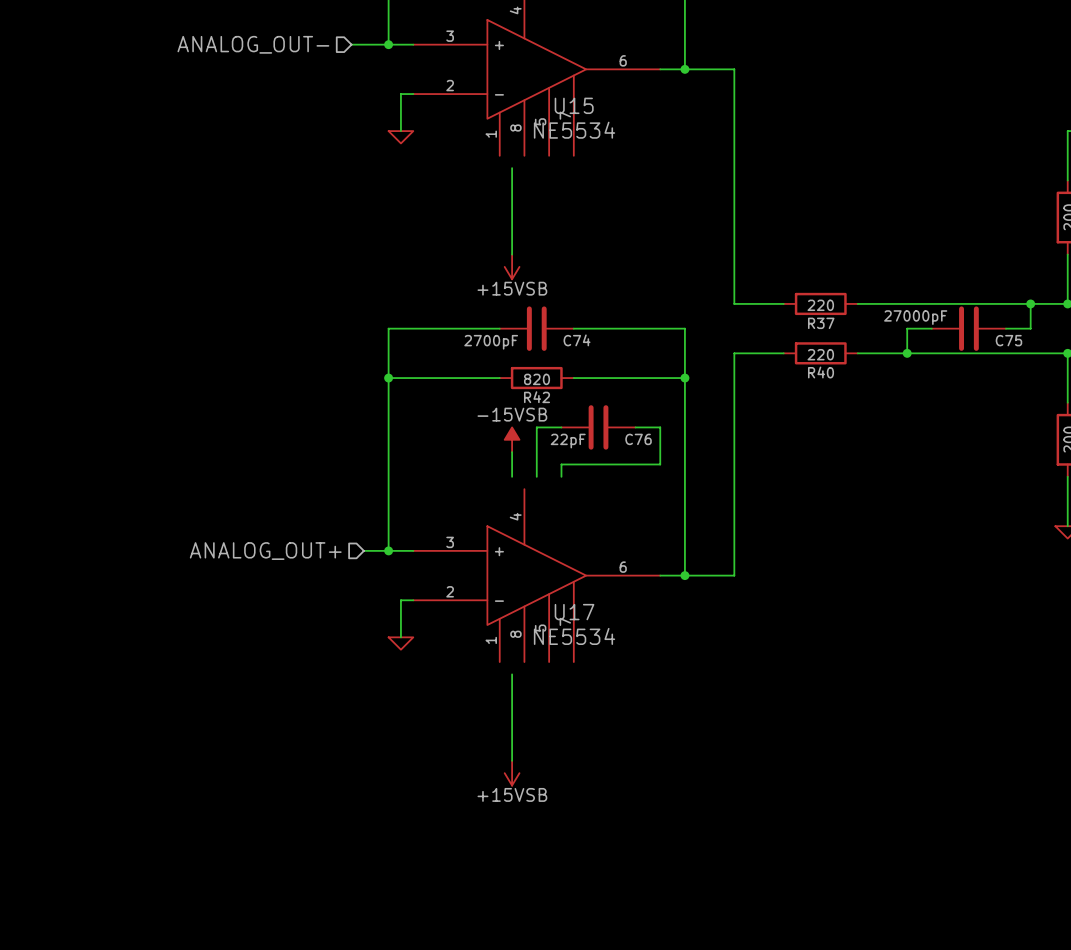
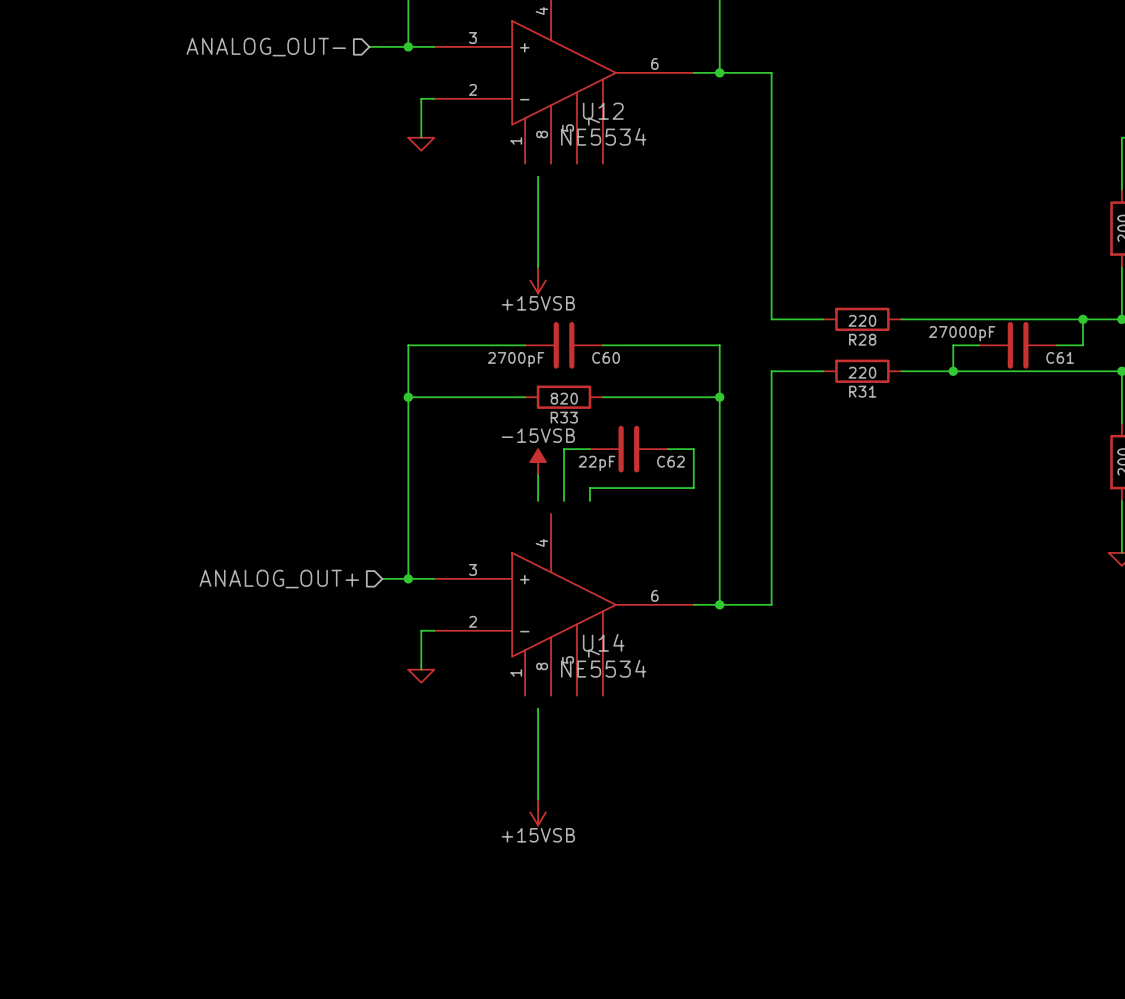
U15 name: U15 (574, 105) -> U12 (603, 111)
R37 name: R37 (821, 323) -> R28 (862, 339)
C74 name: C74 (577, 340) -> C60 (606, 357)
C75 name: C75 (1008, 340) -> C61 (1060, 357)
R40 name: R40 (821, 372) -> R31 (862, 391)
R42 name: R42 (537, 397) -> R33 (564, 417)
C76 name: C76 (638, 439) -> C62 (670, 461)
U17 name: U17 (574, 612) -> U14 (603, 642)

